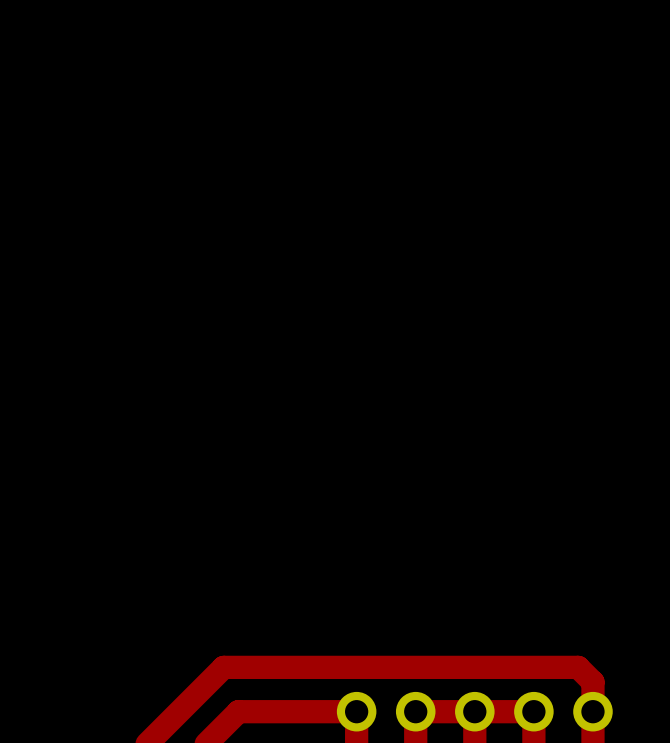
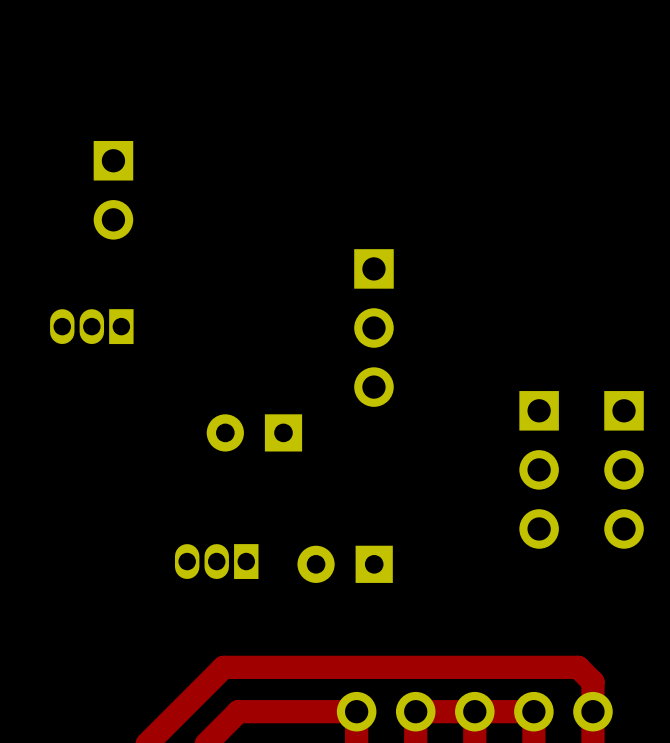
part: none -> (113, 190)
part: none -> (91, 326)
part: none -> (373, 328)
part: none -> (254, 432)
part: none -> (539, 469)
part: none -> (624, 469)
part: none -> (216, 561)
part: none -> (345, 564)

